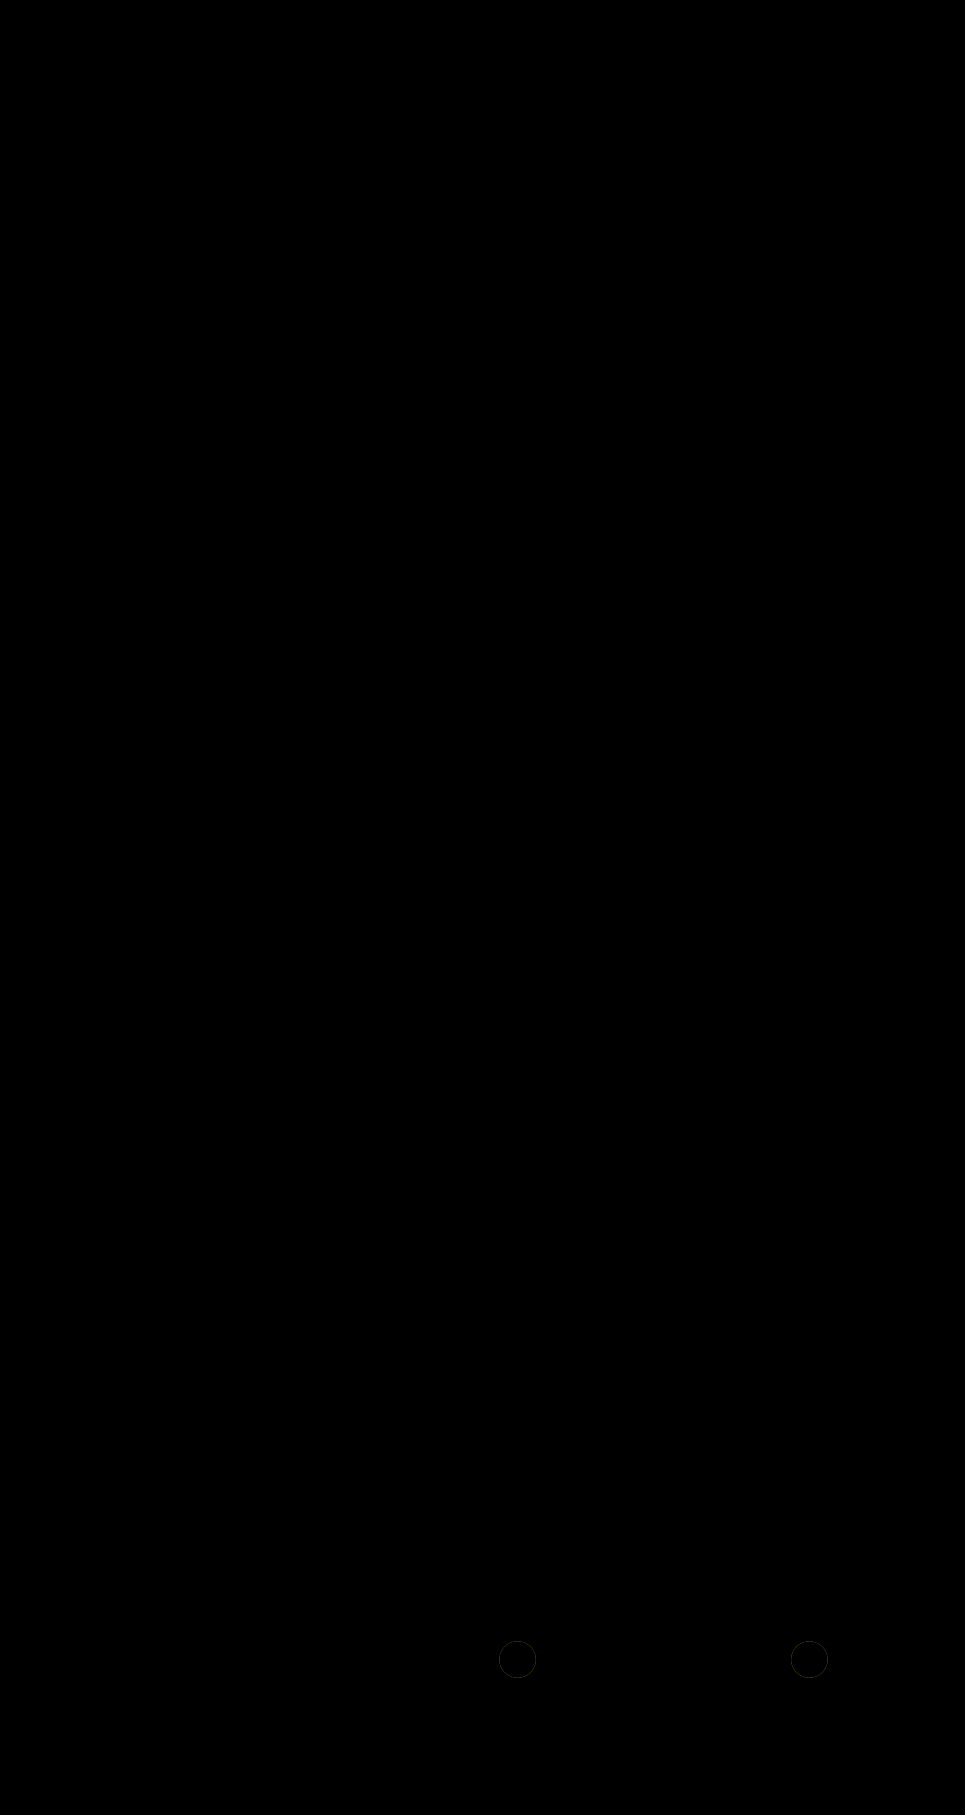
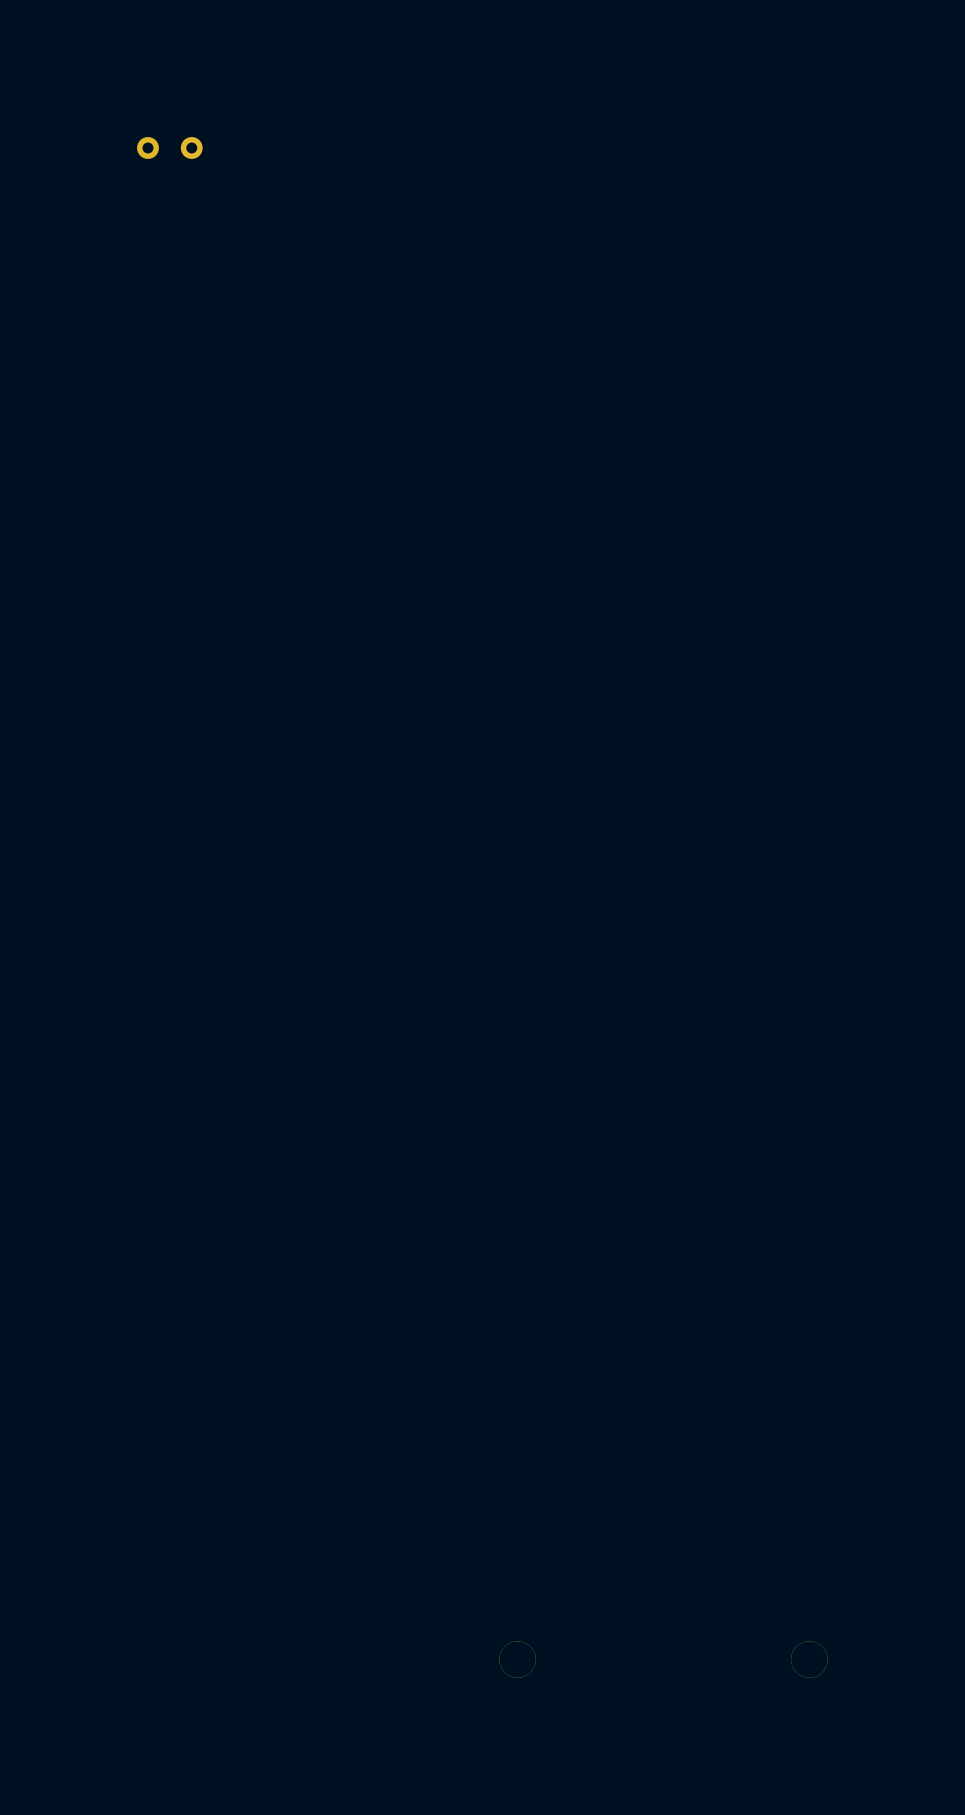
part: none -> (169, 147)

